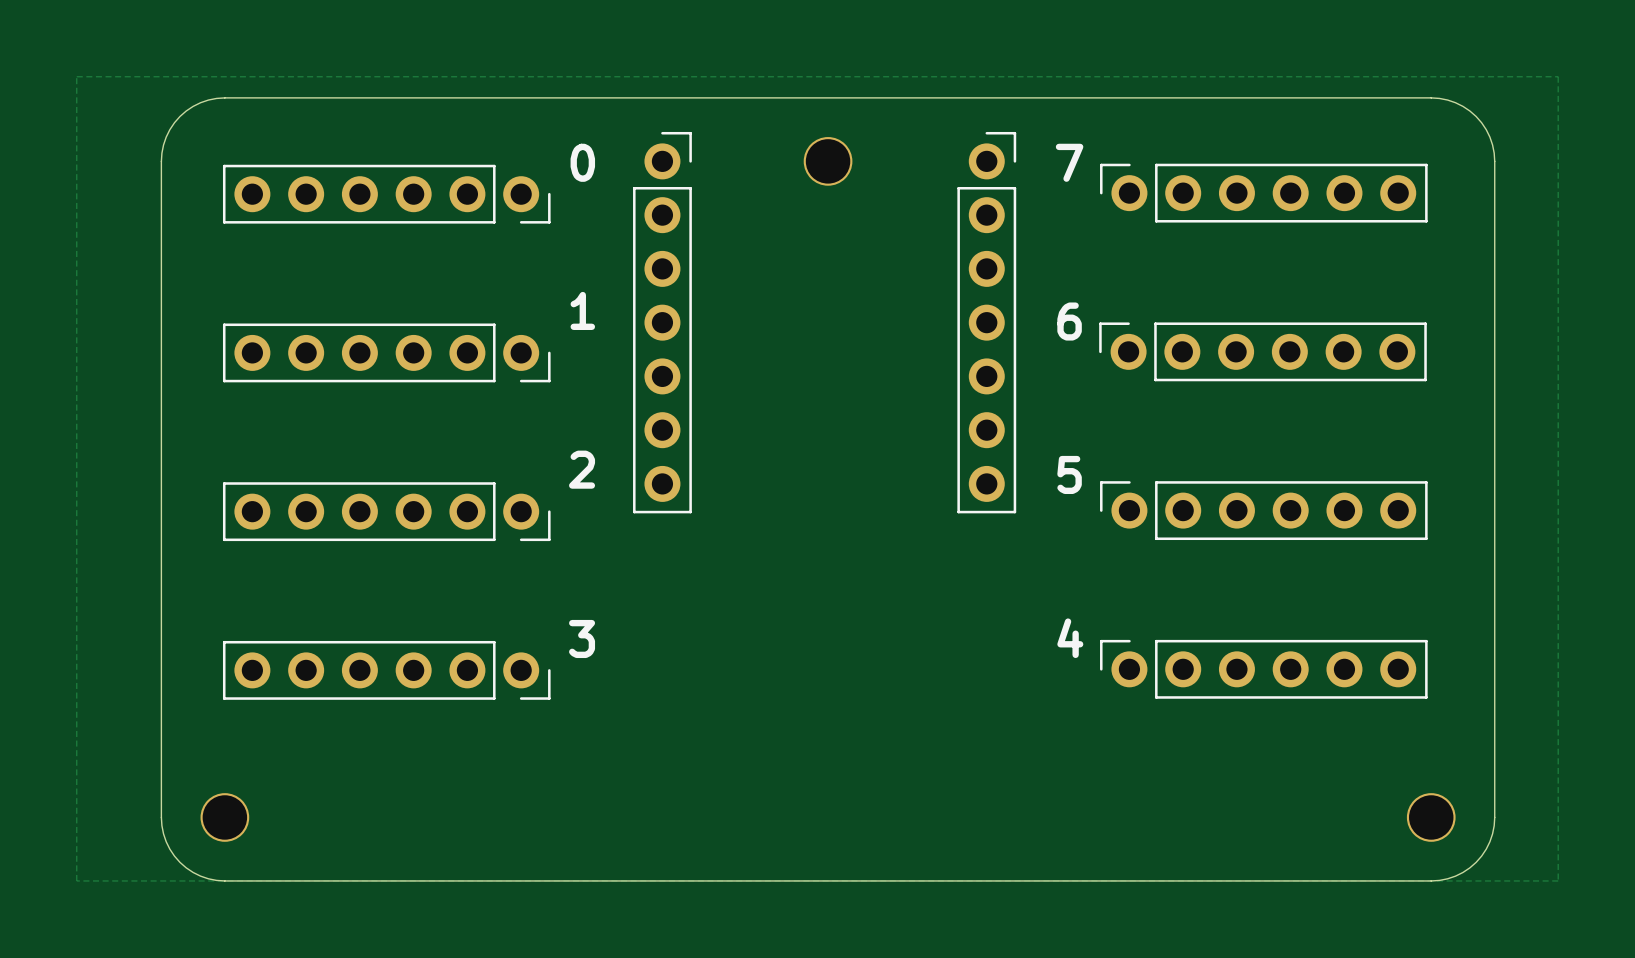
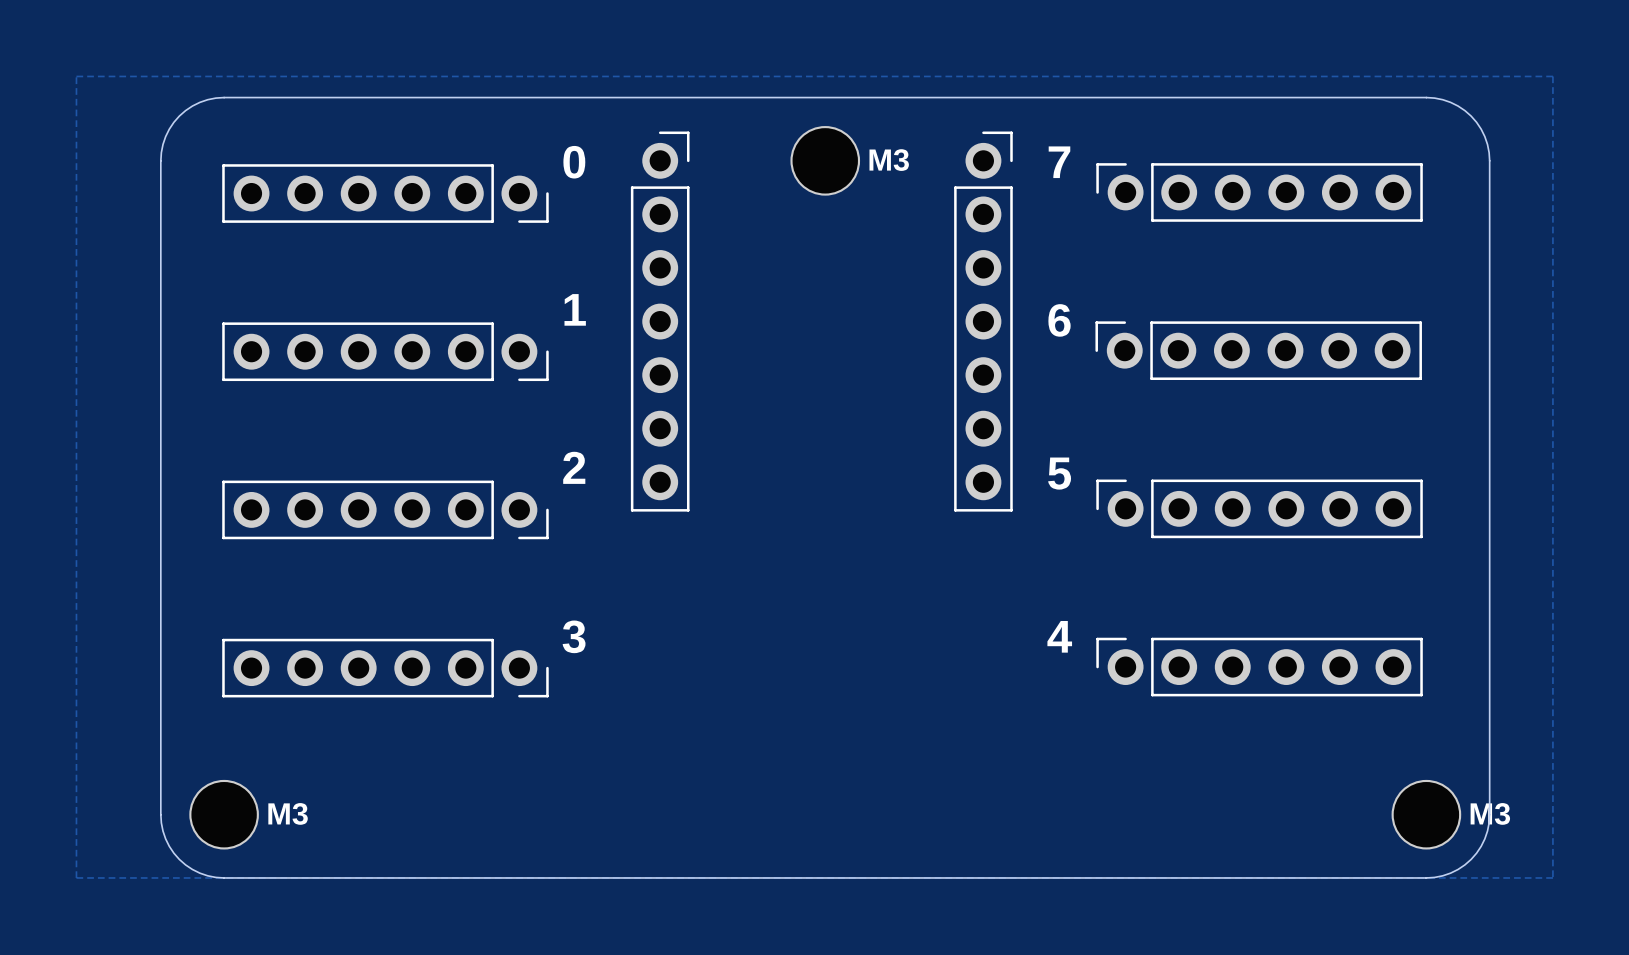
part footprint: [803, 137, 853, 186] -> [790, 126, 861, 196]
part footprint: [200, 793, 250, 842] -> [189, 779, 259, 850]
part footprint: [1406, 793, 1456, 842] -> [1391, 779, 1462, 850]

